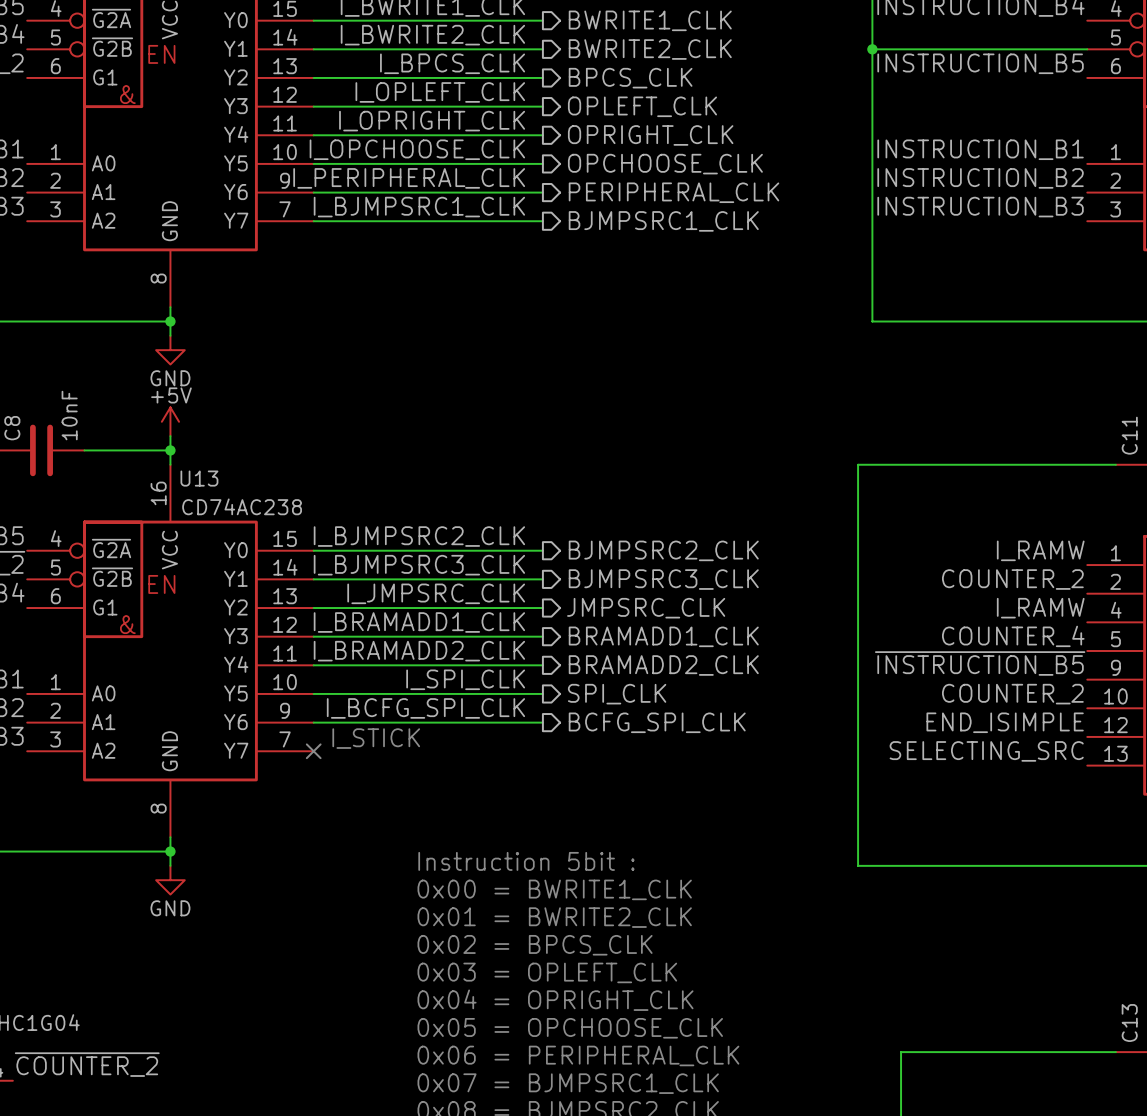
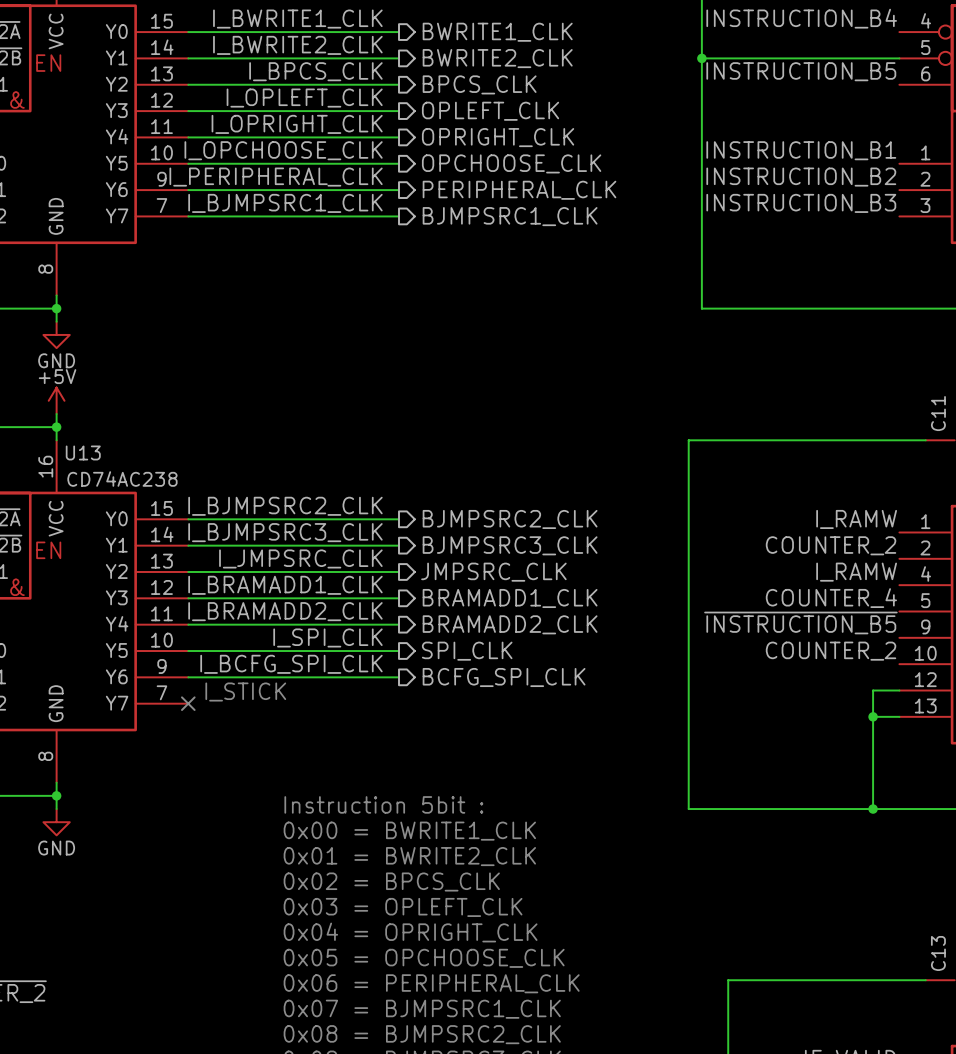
label: END_ISIMPLE (1005, 722) -> none
wire: none -> (899, 690) (873, 690) (873, 809)
label: SELECTING_SRC (986, 751) -> none
wire: none -> (873, 716) (899, 716)
junction: none -> (873, 716)
junction: none -> (873, 809)

